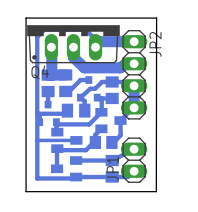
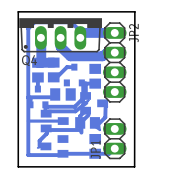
bottom track: none -> (83, 84) (83, 103) (88, 100) (75, 111) (48, 111)
bottom track: (84, 110) (84, 101) (80, 97) (102, 81) (129, 81) (134, 85) (134, 107) (120, 120) (120, 135) (111, 142) -> none
bottom track: none -> (107, 106) (105, 117) (99, 123) (99, 130) (95, 127)
bottom track: none -> (88, 115) (81, 121) (81, 132) (81, 127)
bottom track: (95, 142) (86, 150) (57, 148) (57, 168) -> none
bottom track: none -> (81, 127) (79, 130) (47, 130) (47, 128) (46, 133) (39, 140) (40, 147) (37, 147)
bottom track: (134, 149) (112, 160) (76, 160) -> none

